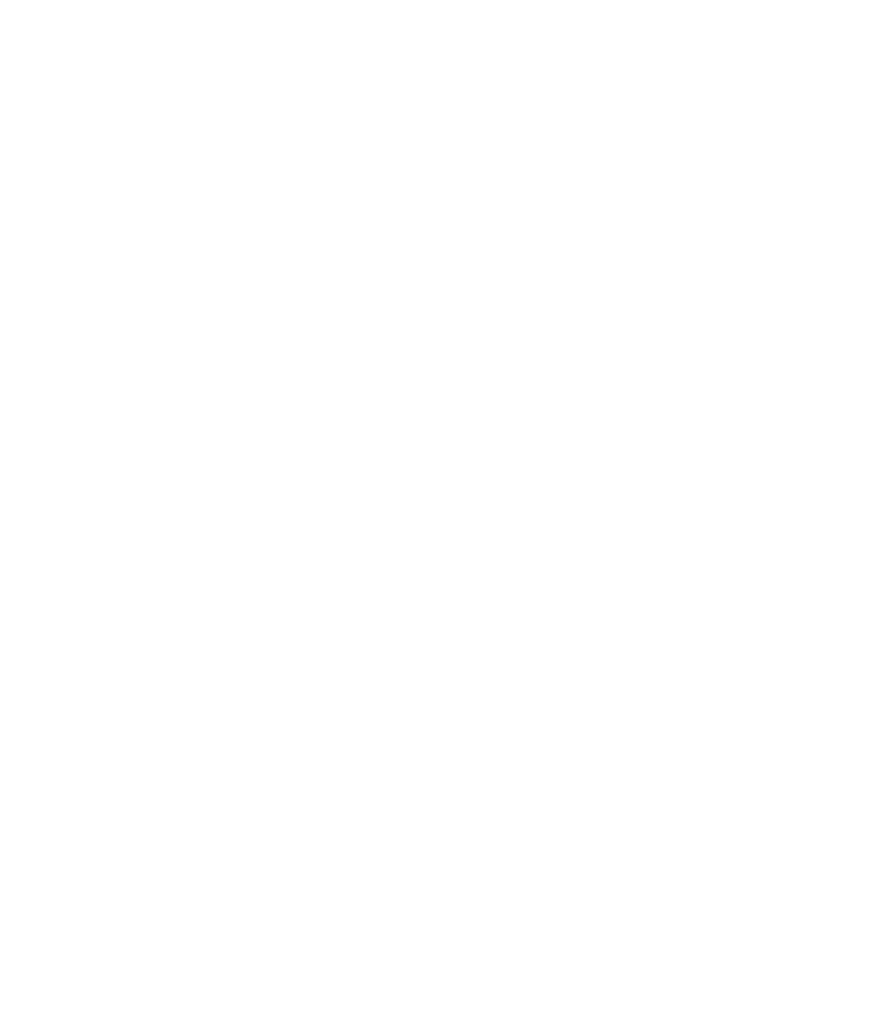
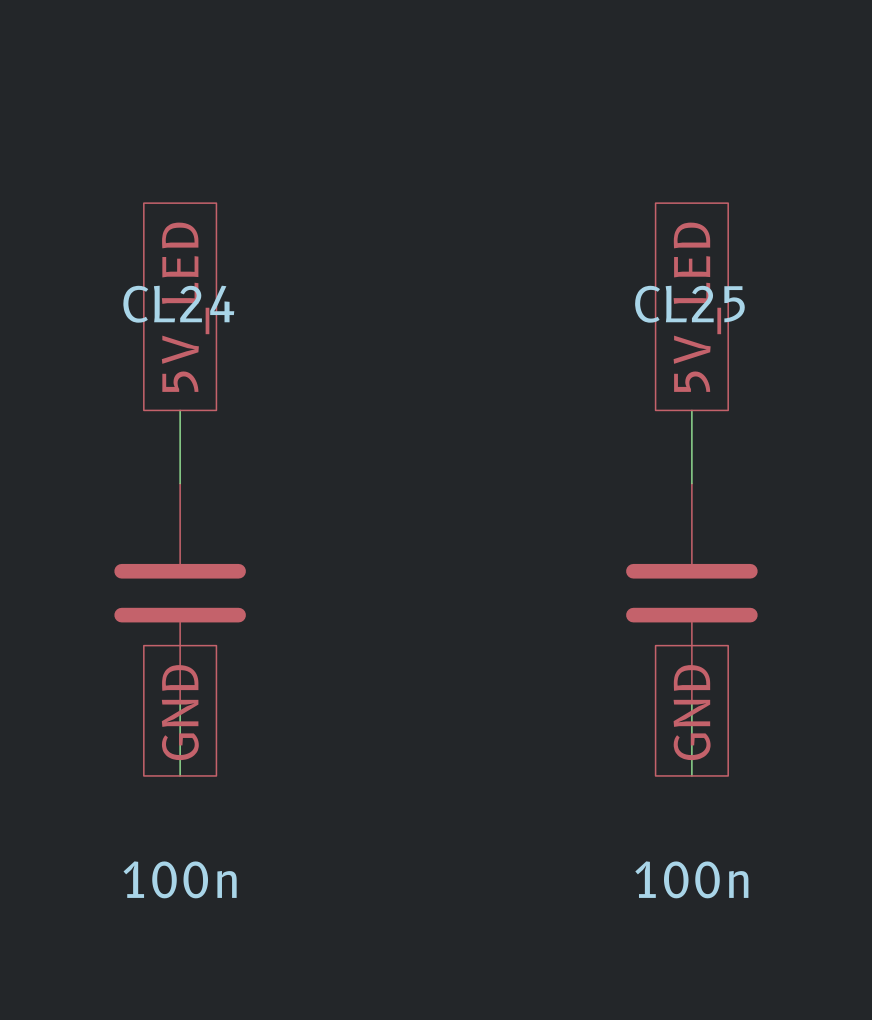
global label: none -> 5V_LED (185, 307)
global label: none -> 5V_LED (697, 307)
wire: none -> (180, 410) (180, 483)
wire: none -> (691, 410) (691, 483)
CL24: none -> 100n (180, 593)
CL25: none -> 100n (691, 593)
wire: none -> (180, 702) (180, 775)
wire: none -> (691, 702) (691, 775)
global label: none -> GND (180, 712)
global label: none -> GND (692, 712)

